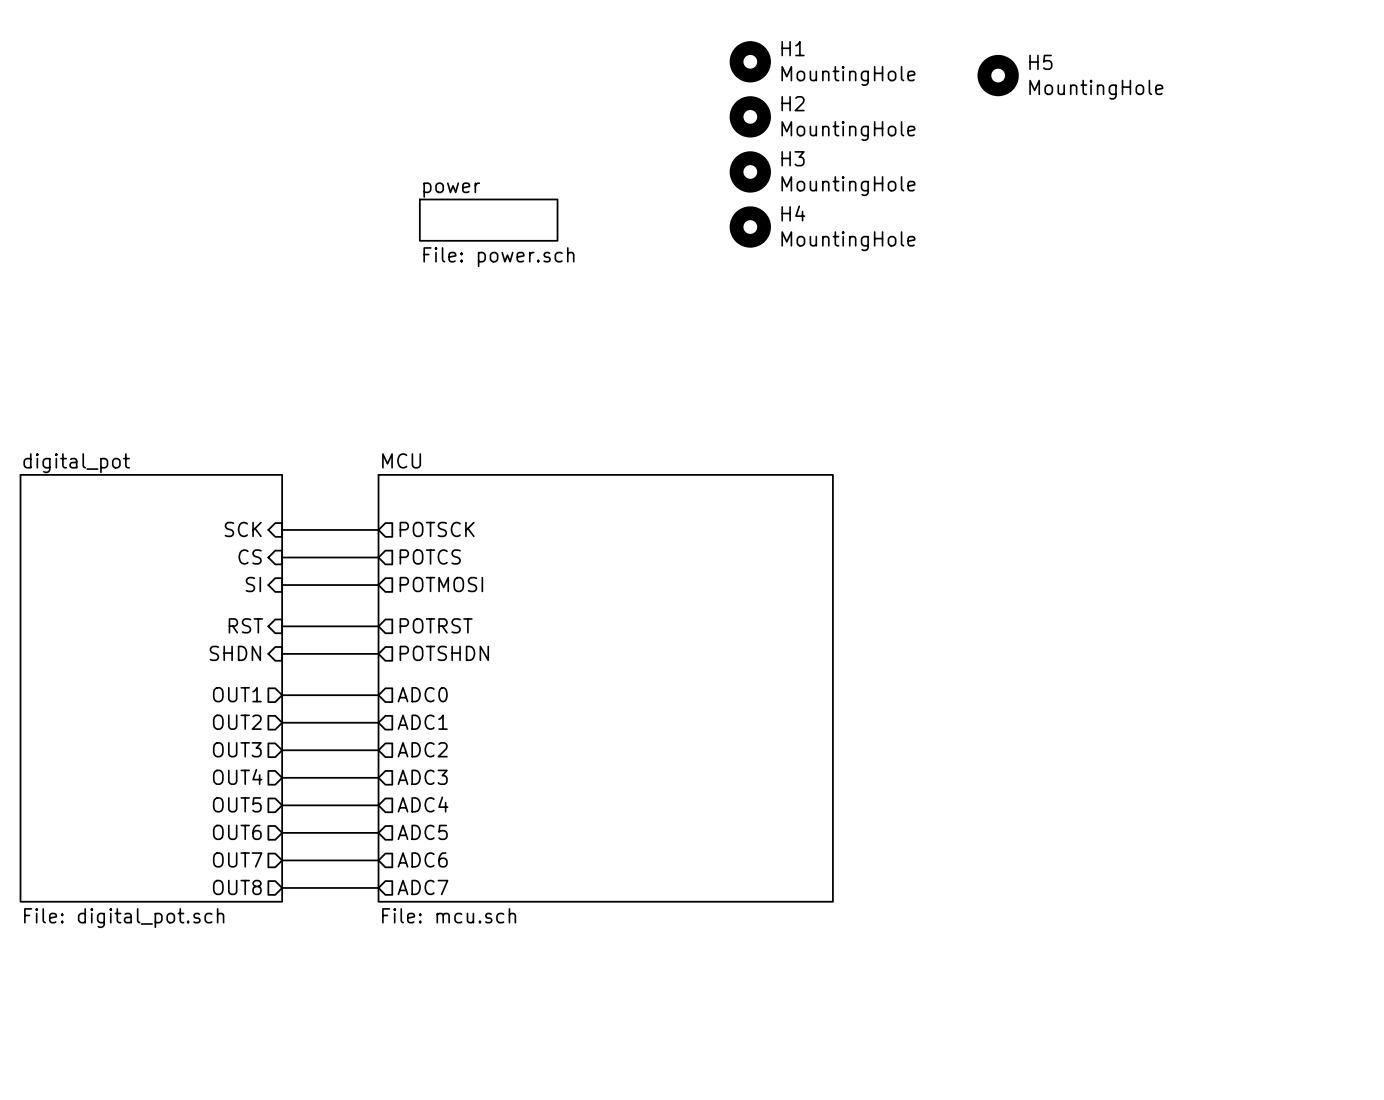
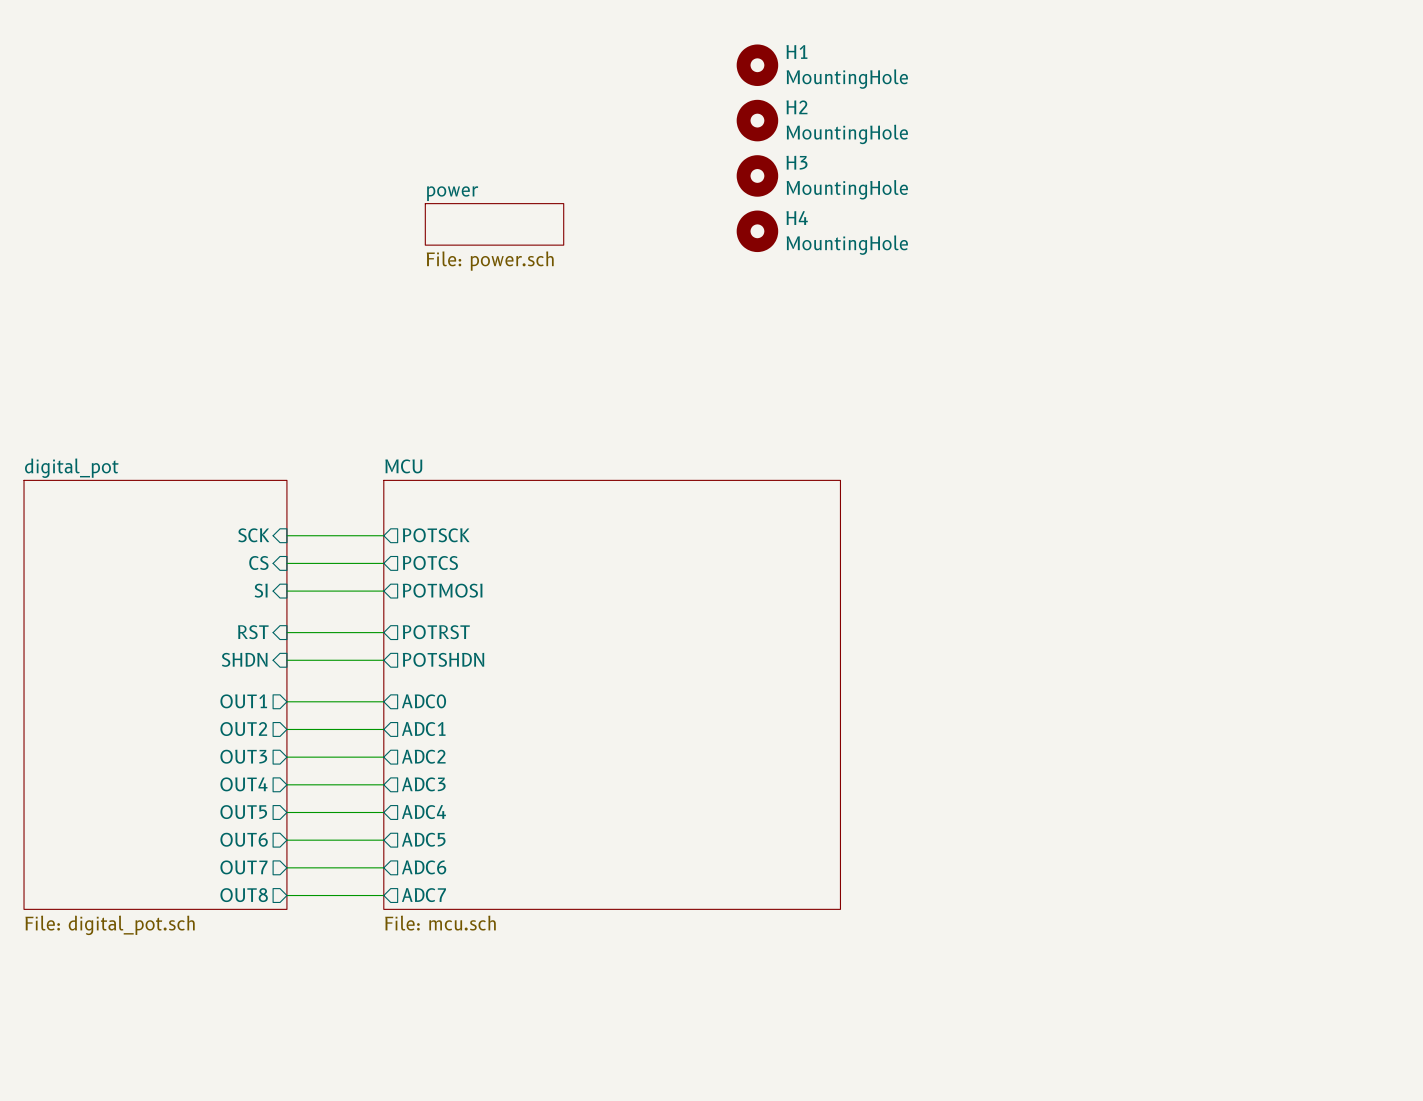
H5: MountingHole (998, 75) -> none

